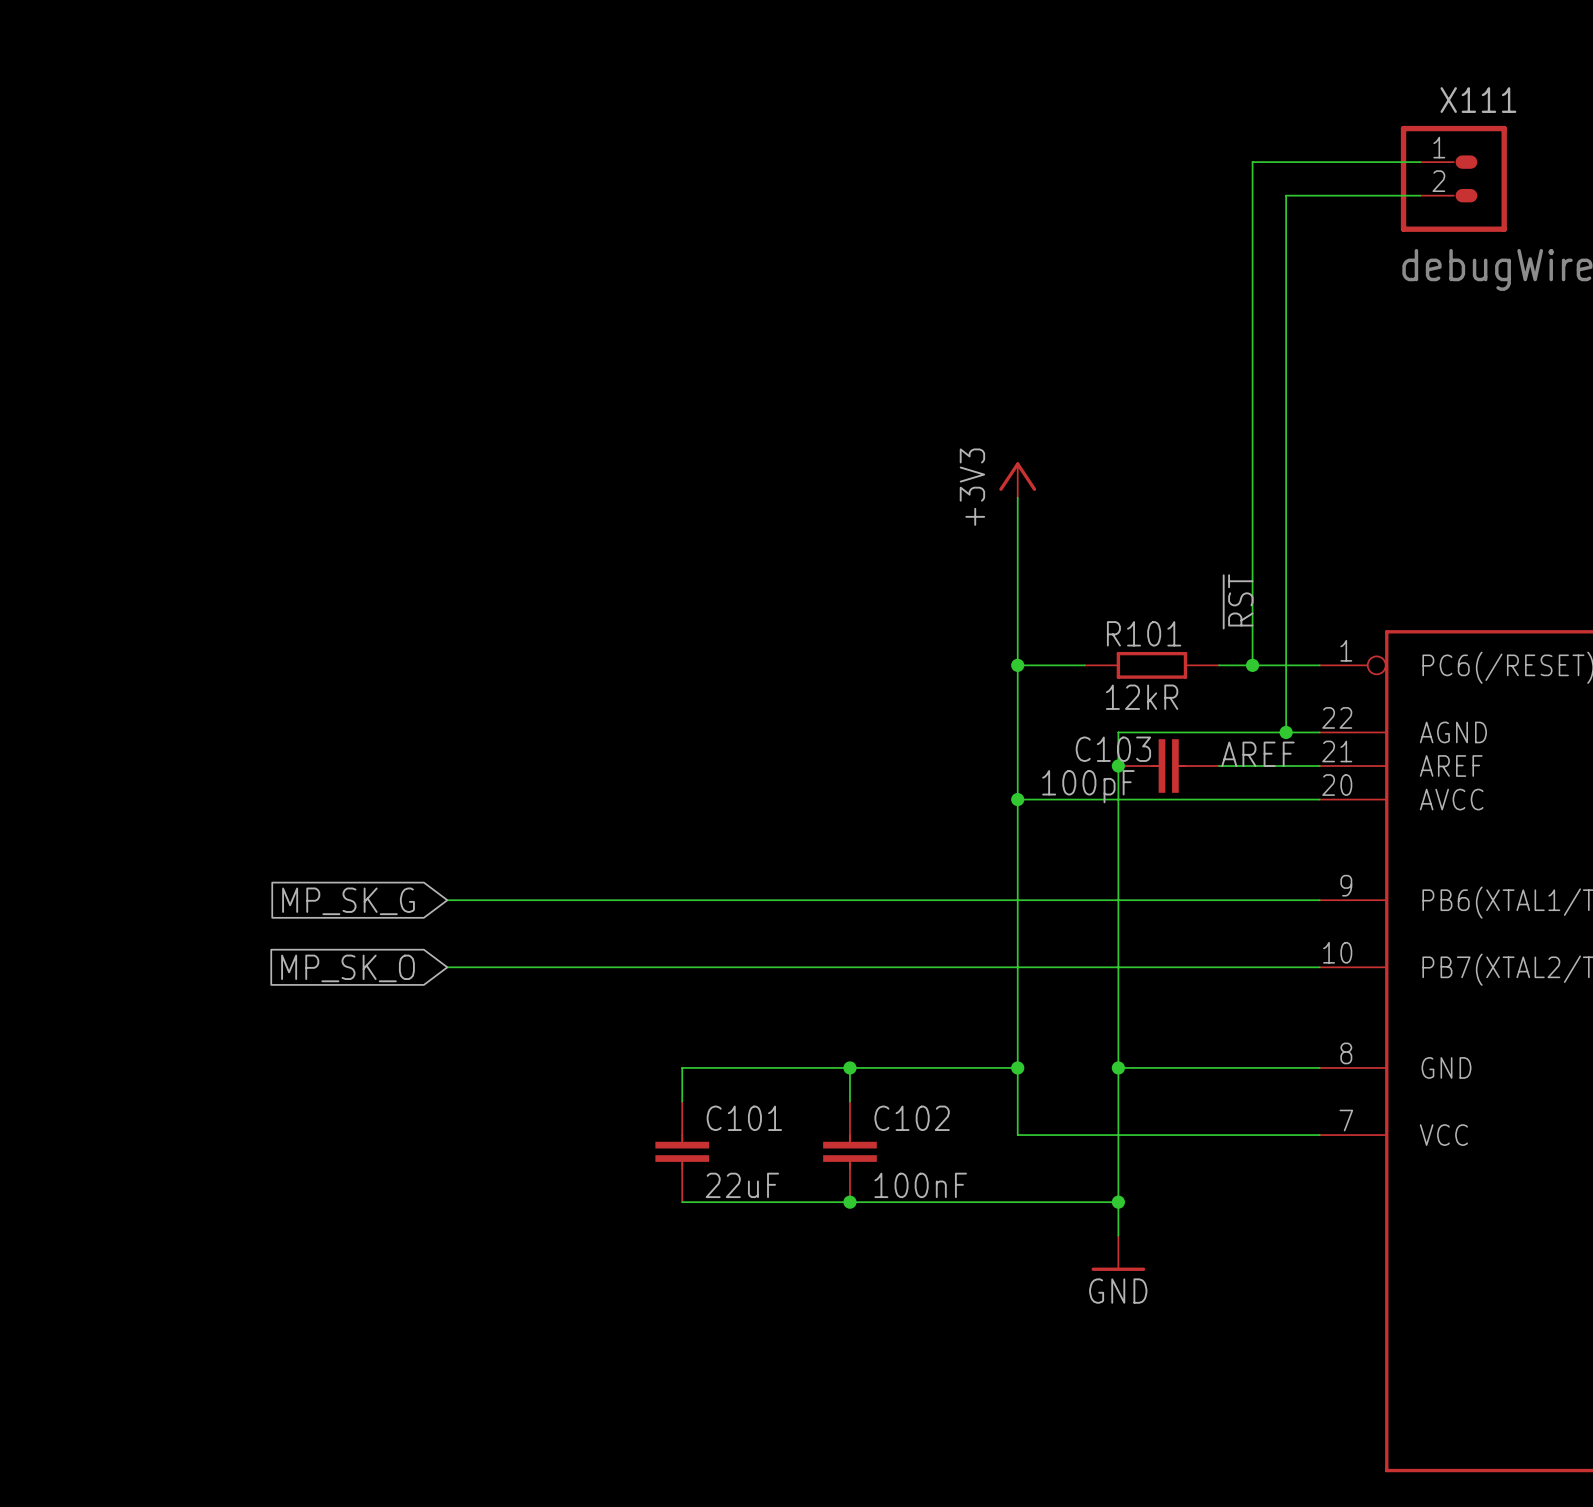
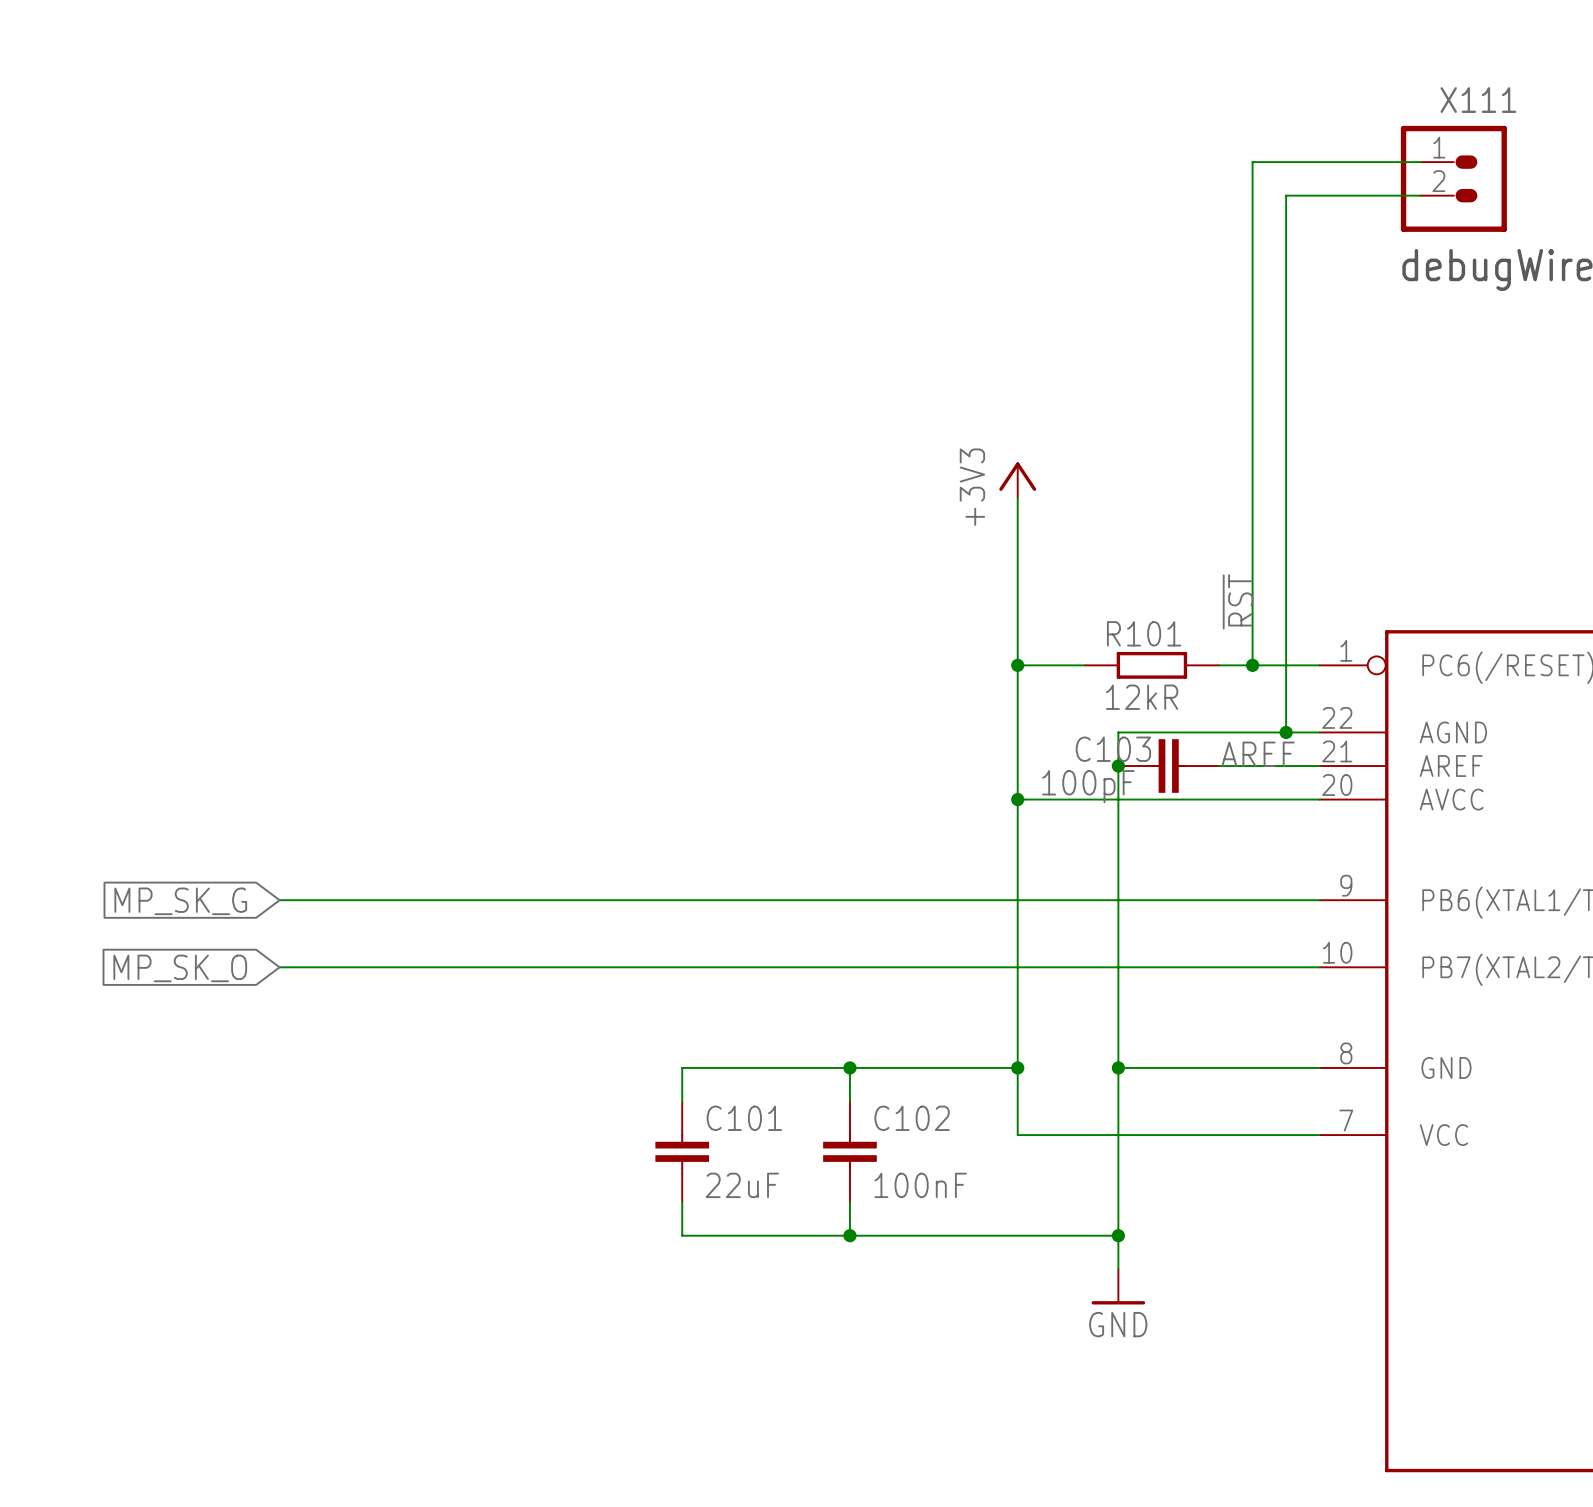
wire: none -> (279, 900) (447, 900)
global label position: MP_SK_G (348, 901) -> MP_SK_G (180, 901)
wire: none -> (279, 967) (447, 967)
global label position: MP_SK_O (348, 968) -> MP_SK_O (180, 968)
wire: (682, 1202) (1118, 1202) -> (682, 1202) (682, 1235) (1118, 1235) (1118, 1269)
wire: none -> (849, 1202) (849, 1235)
junction position: (849, 1202) -> (849, 1235)
junction position: (1118, 1202) -> (1118, 1235)
power symbol position: GND (1118, 1253) -> GND (1118, 1286)

